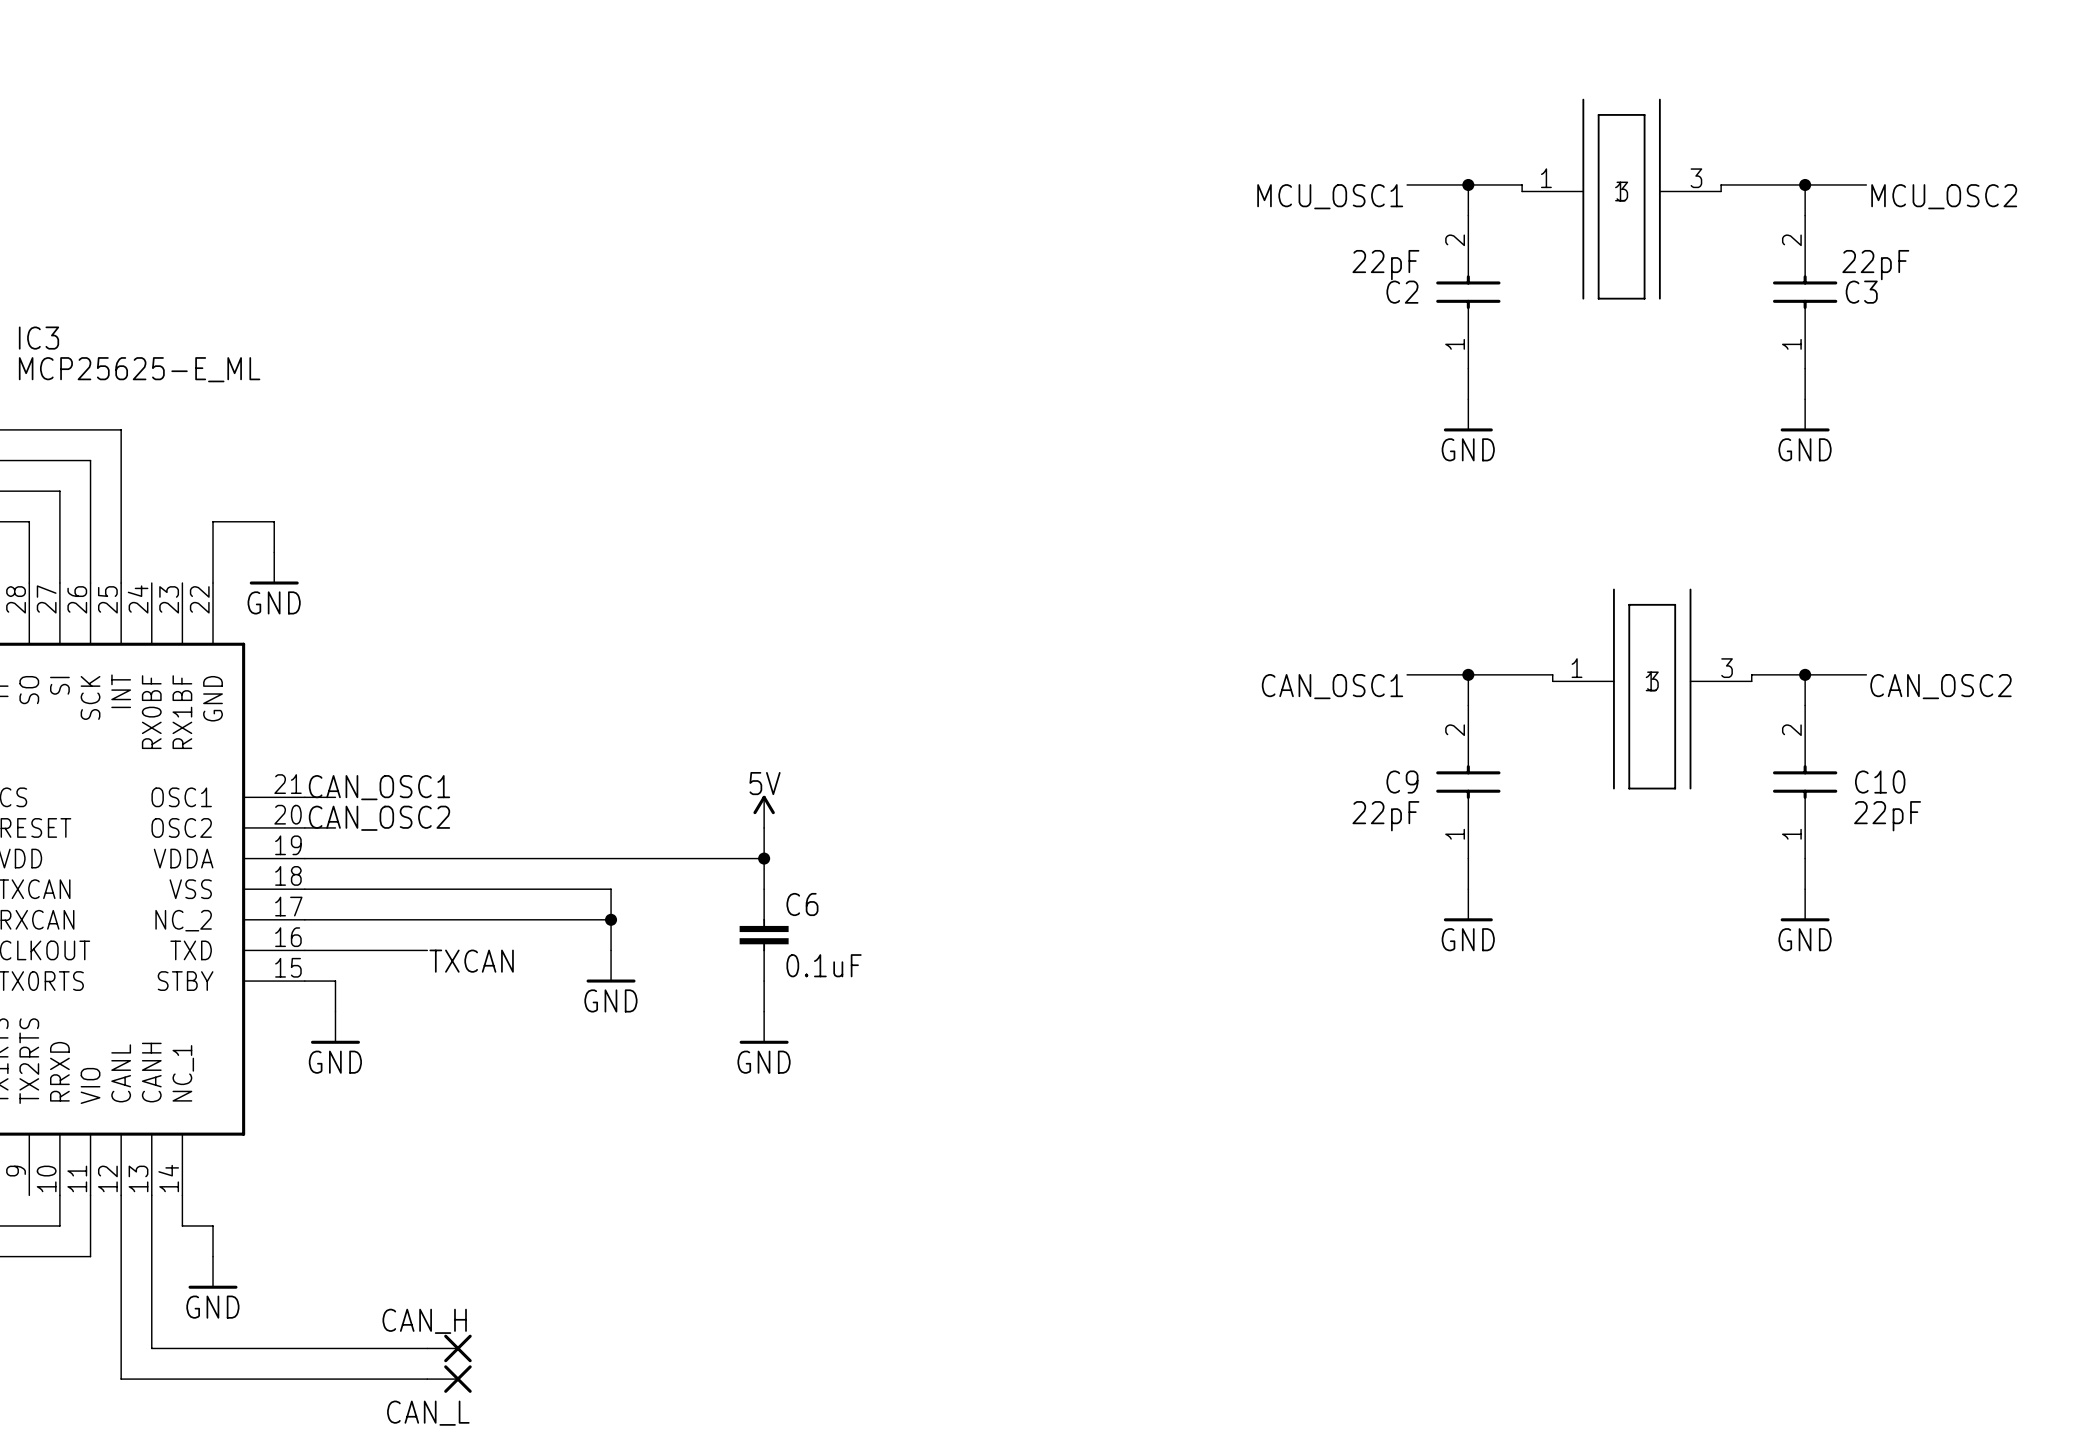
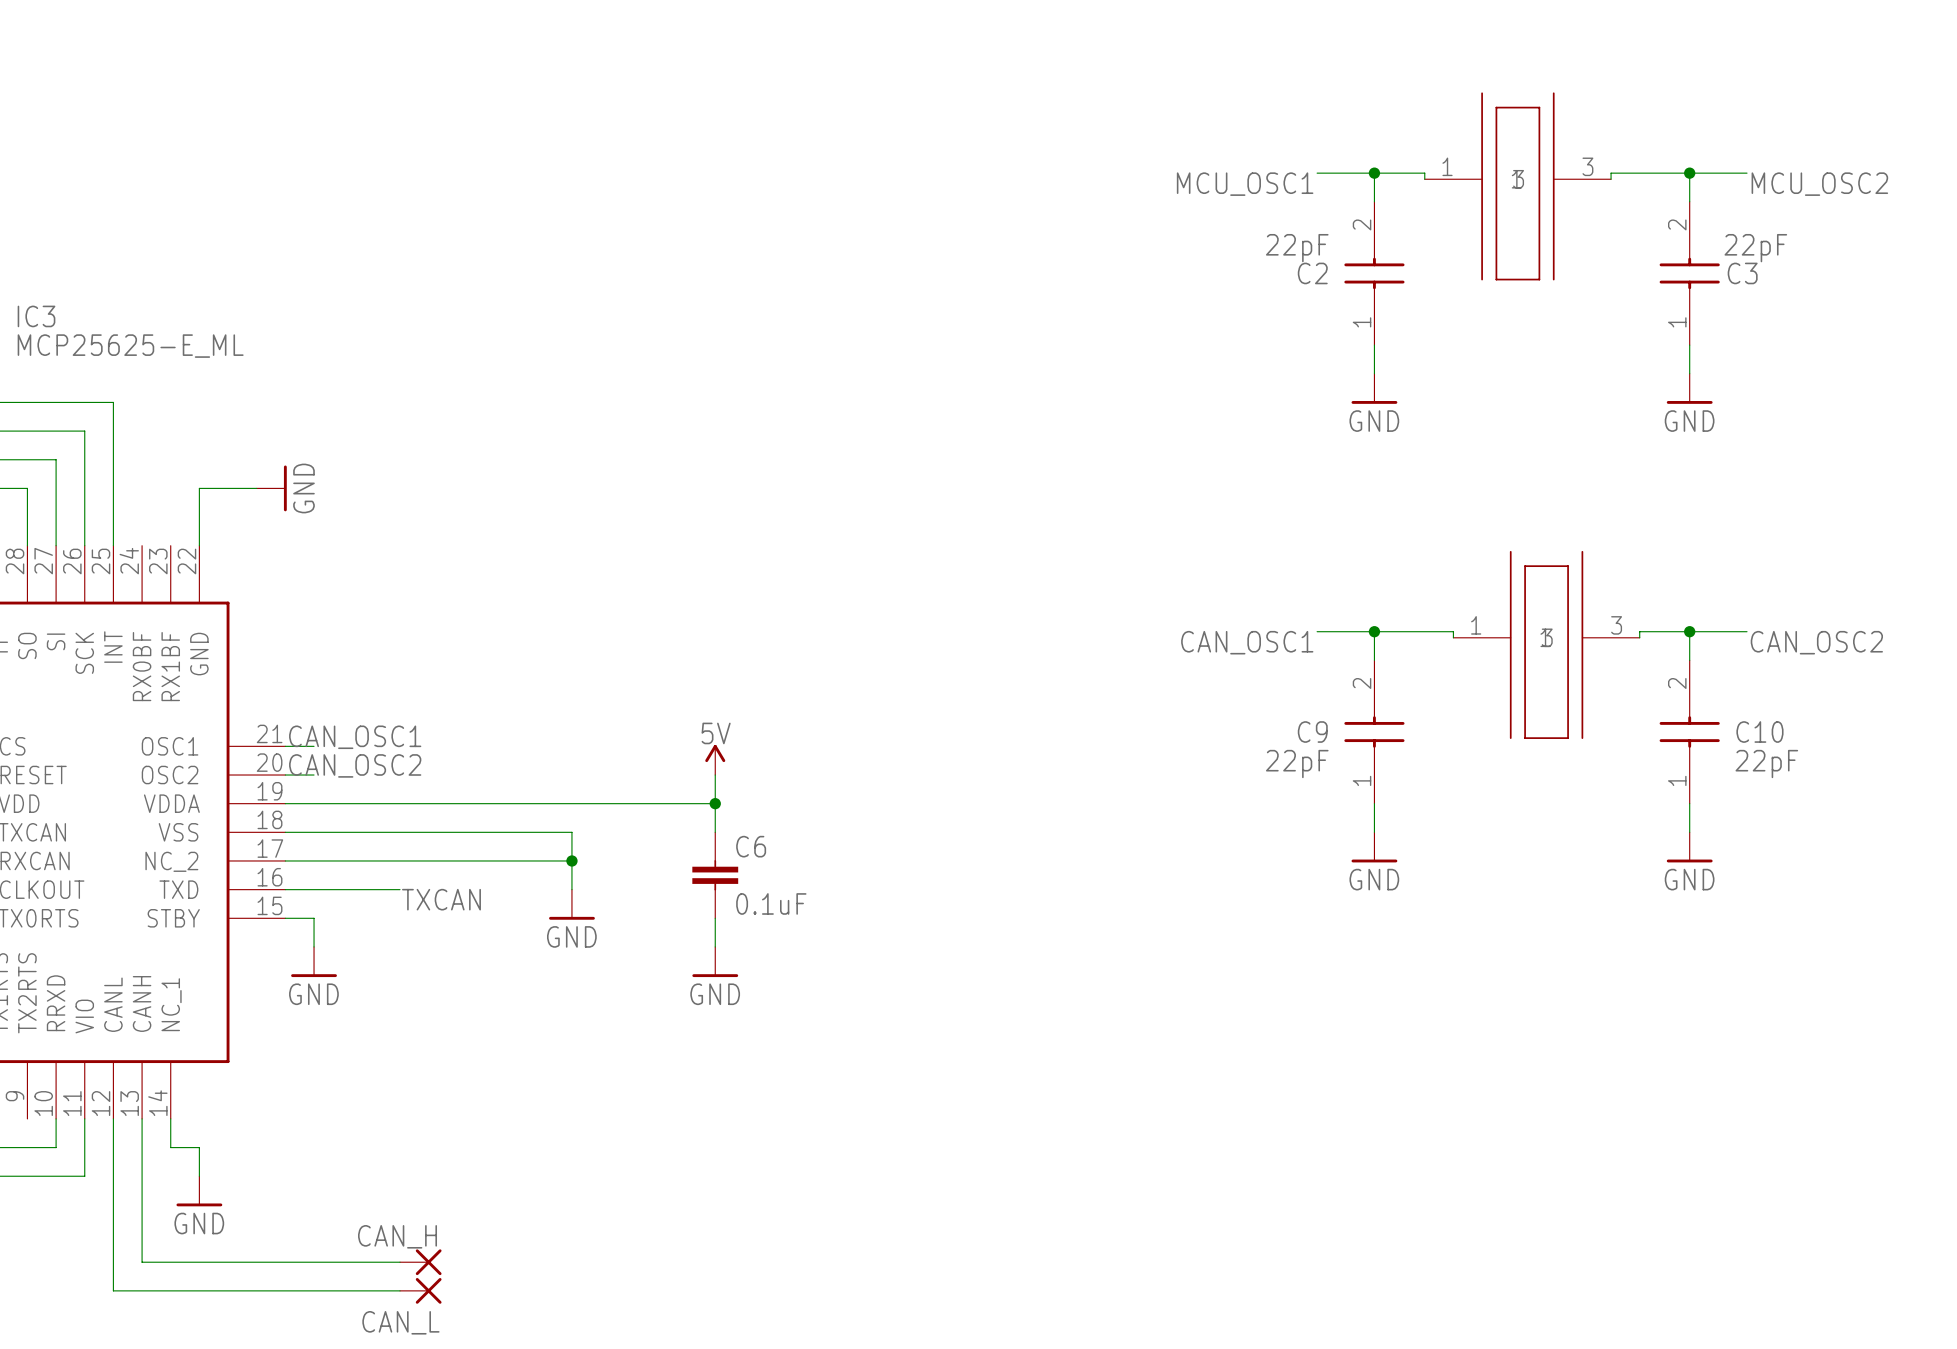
wire: (274, 521) (274, 552) -> none
power symbol position: GND (274, 568) -> GND (271, 488)
power symbol rotation: 0° (274, 583) -> 90° counterclockwise (285, 488)

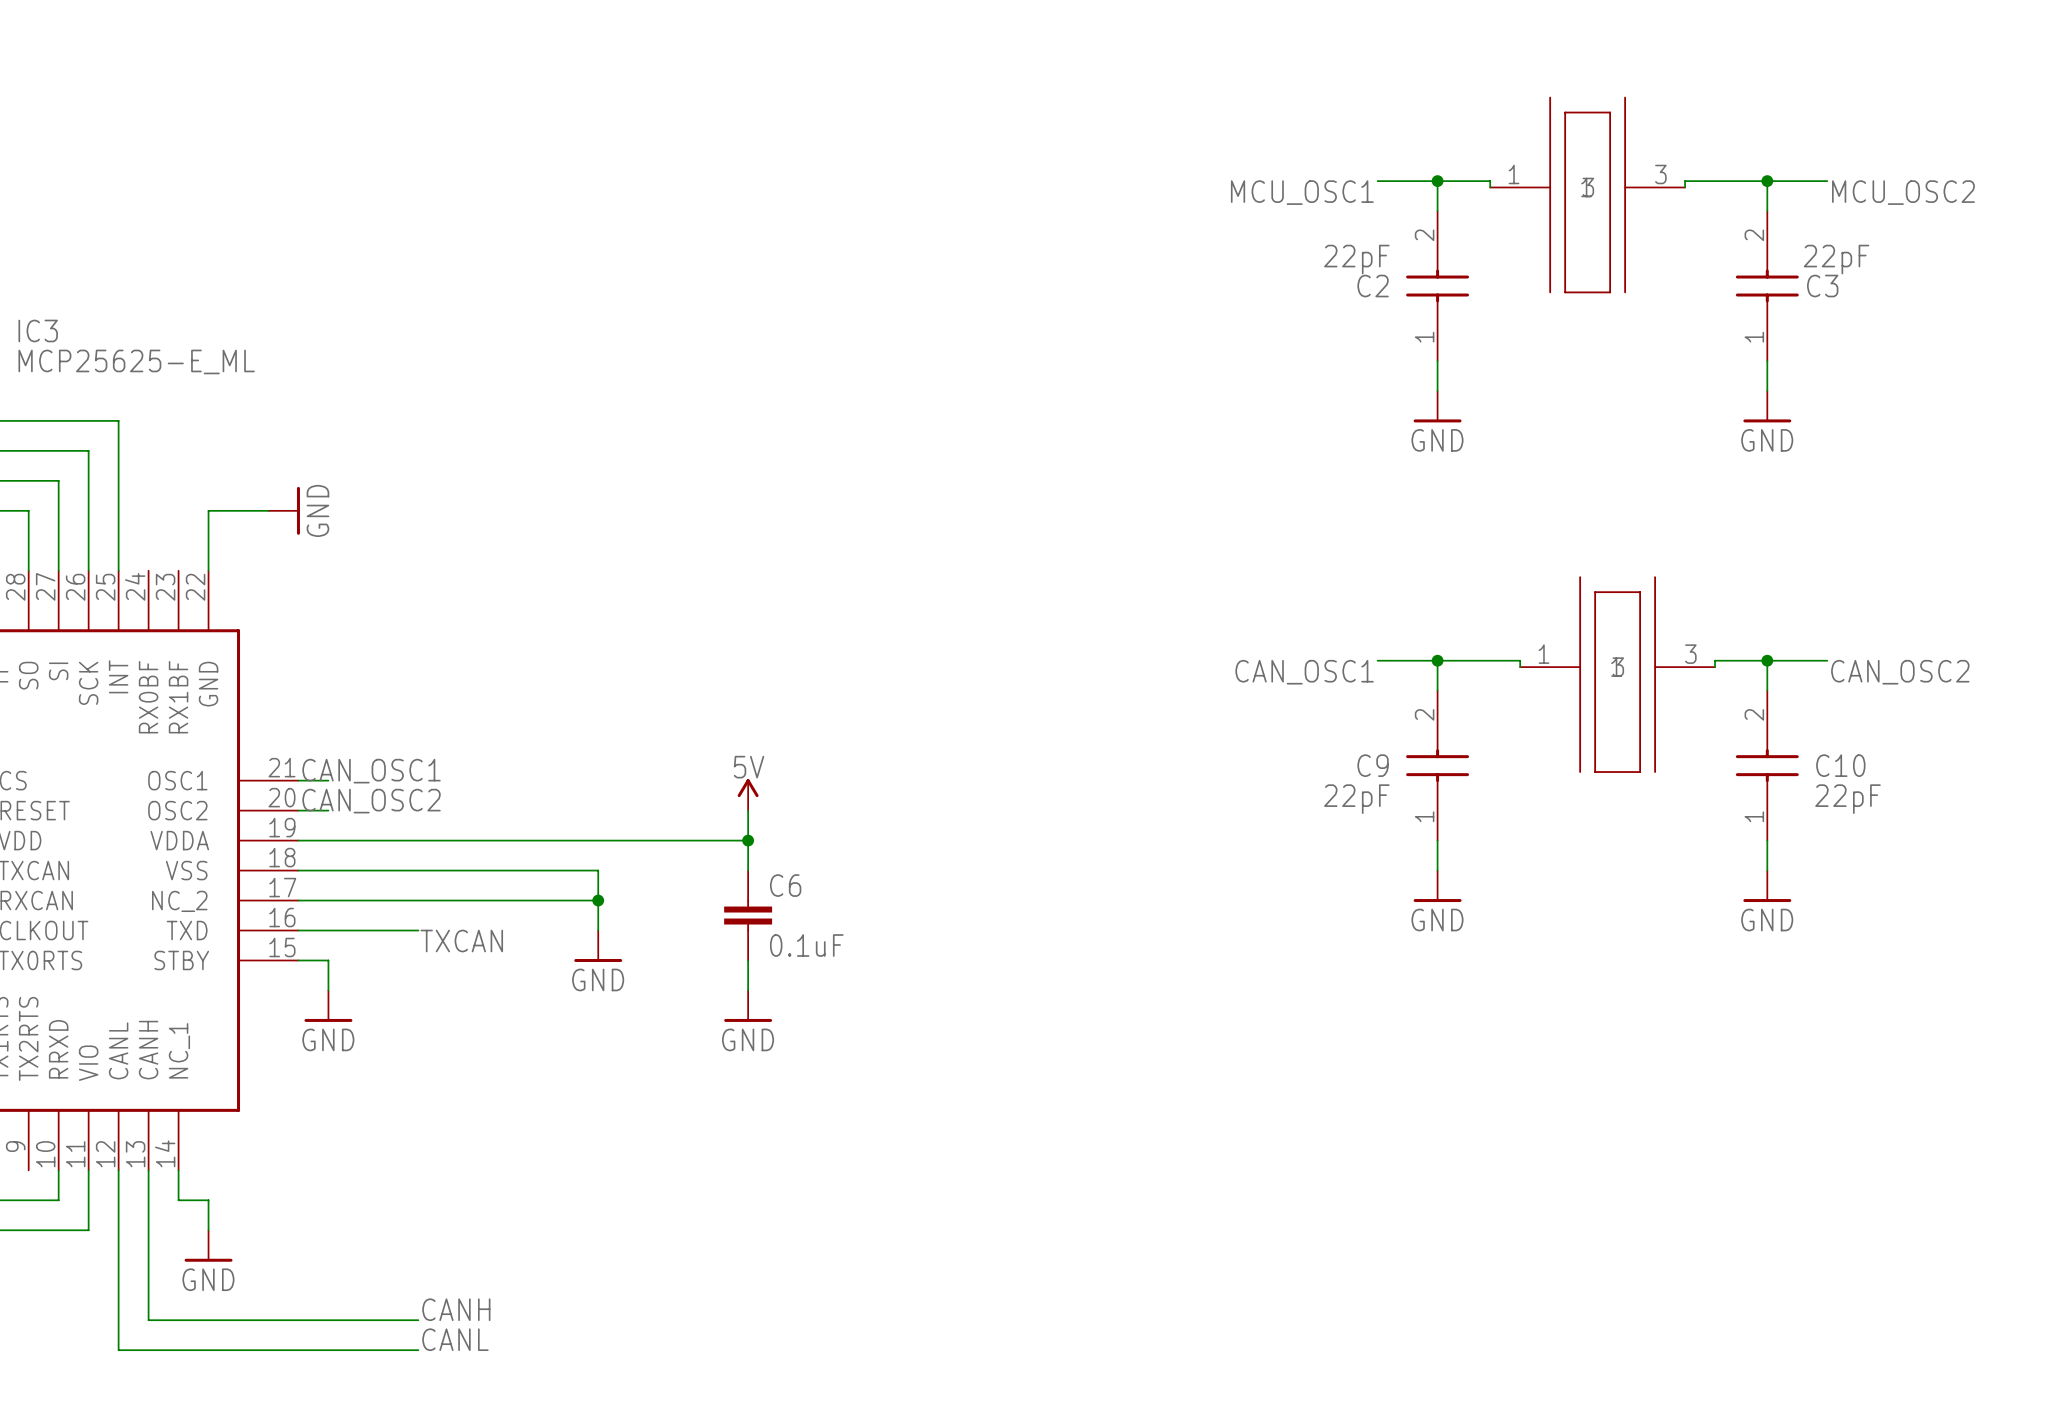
label: none -> CANH (456, 1309)
CAN_H: (420, 1262) -> none
label: none -> CANL (455, 1339)
CAN_L: (420, 1290) -> none

